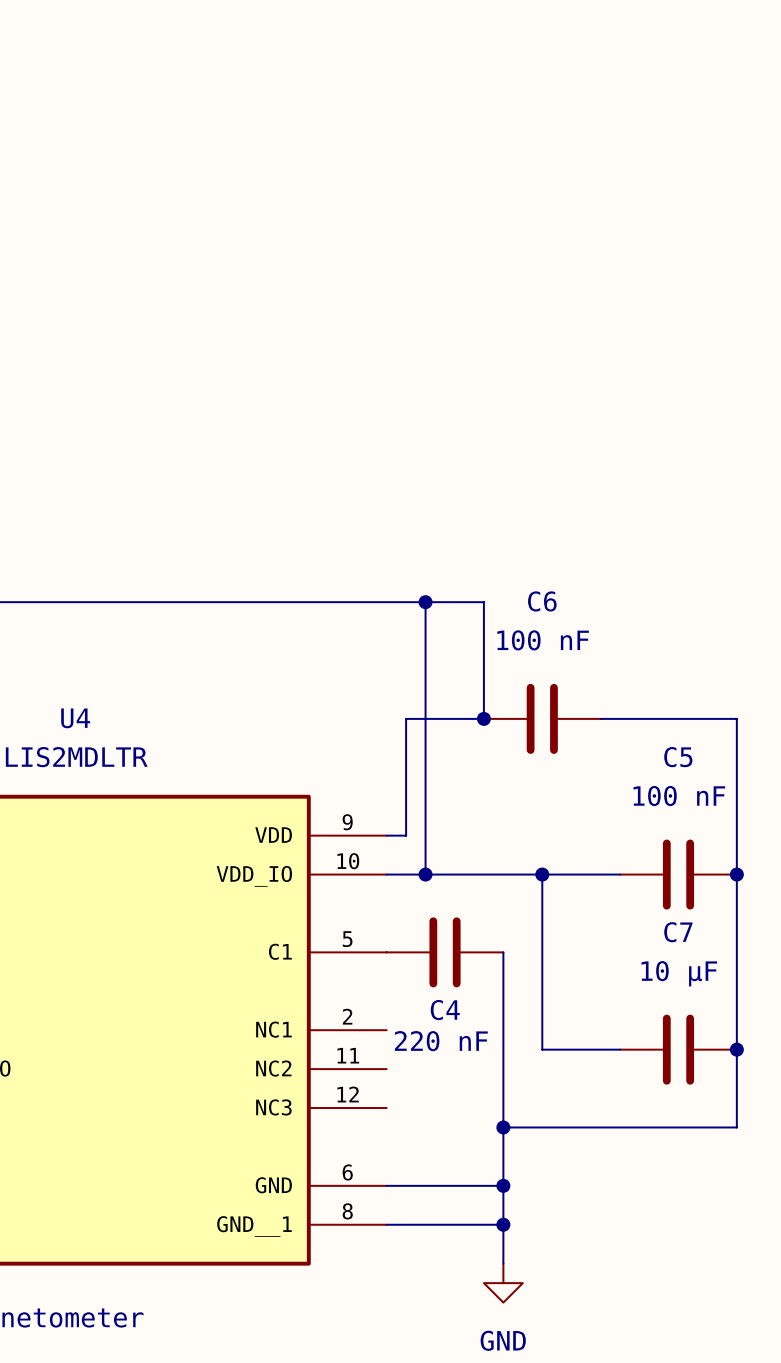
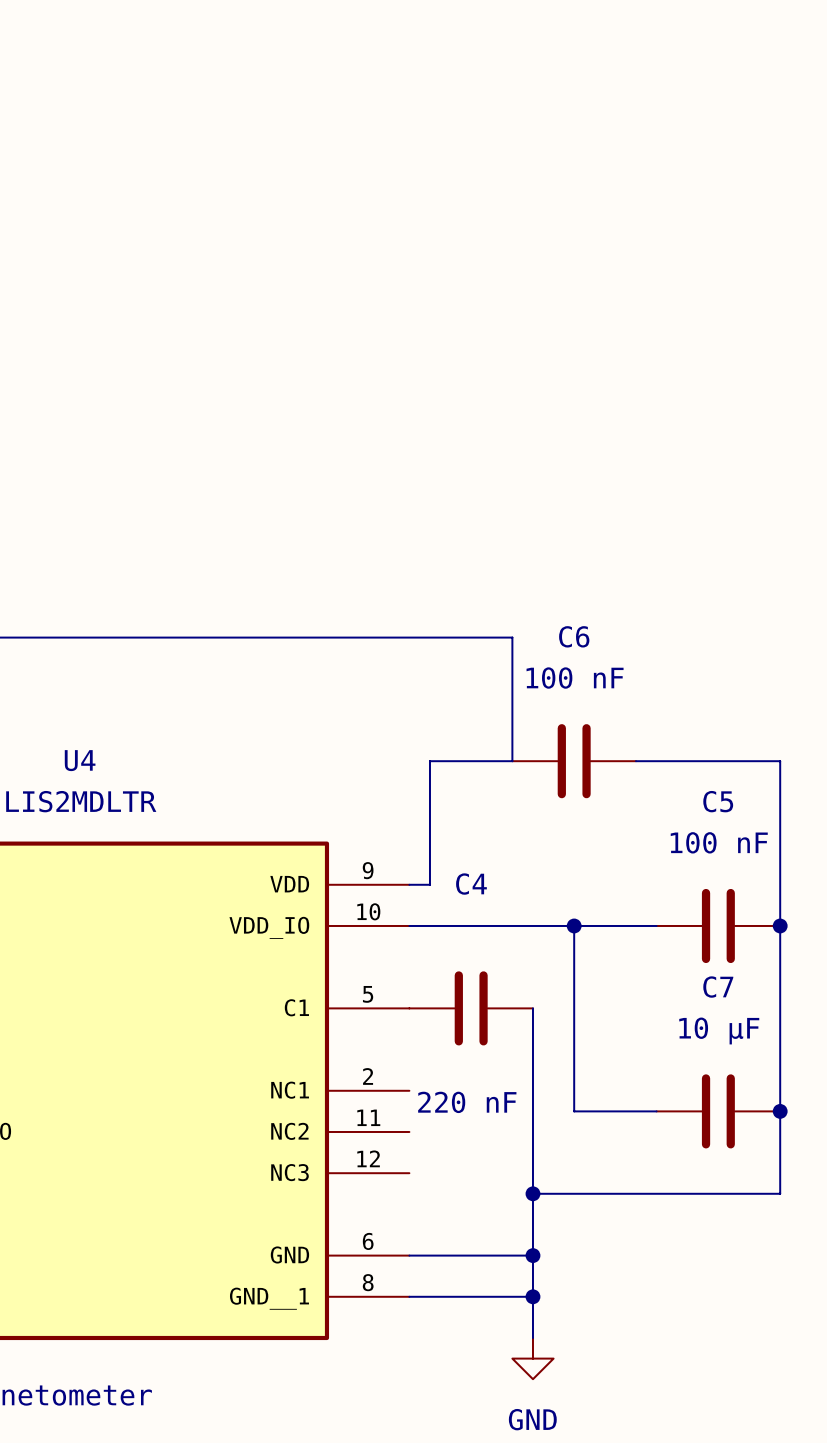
wire: (425, 602) (425, 874) -> none
junction: (425, 602) -> none
junction: (483, 718) -> none
junction: (425, 874) -> none
C4 name position: C4 (445, 1010) -> C4 (471, 884)

